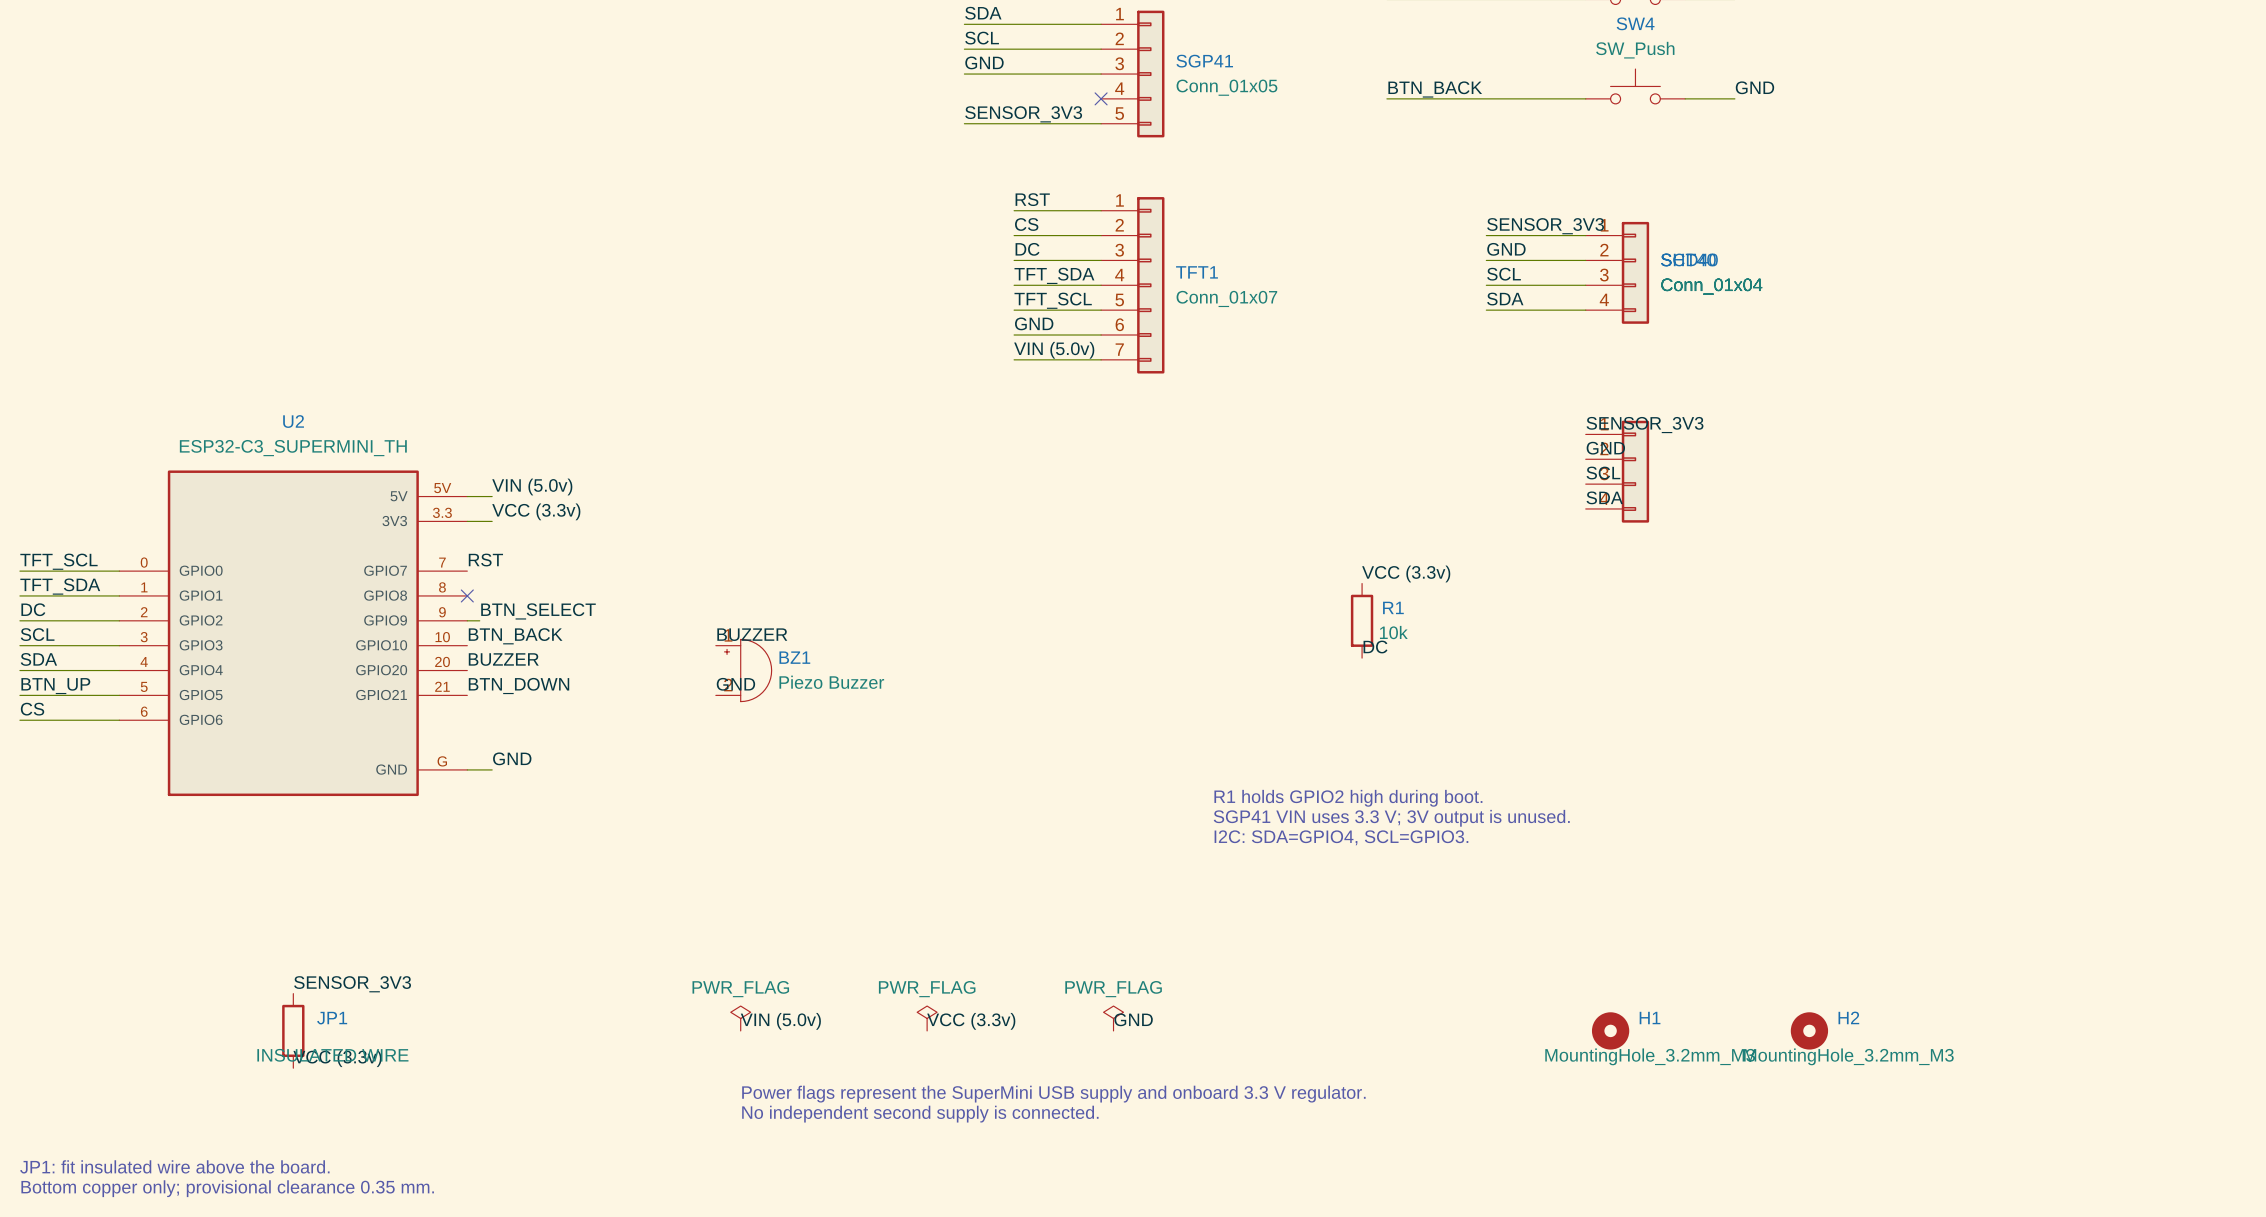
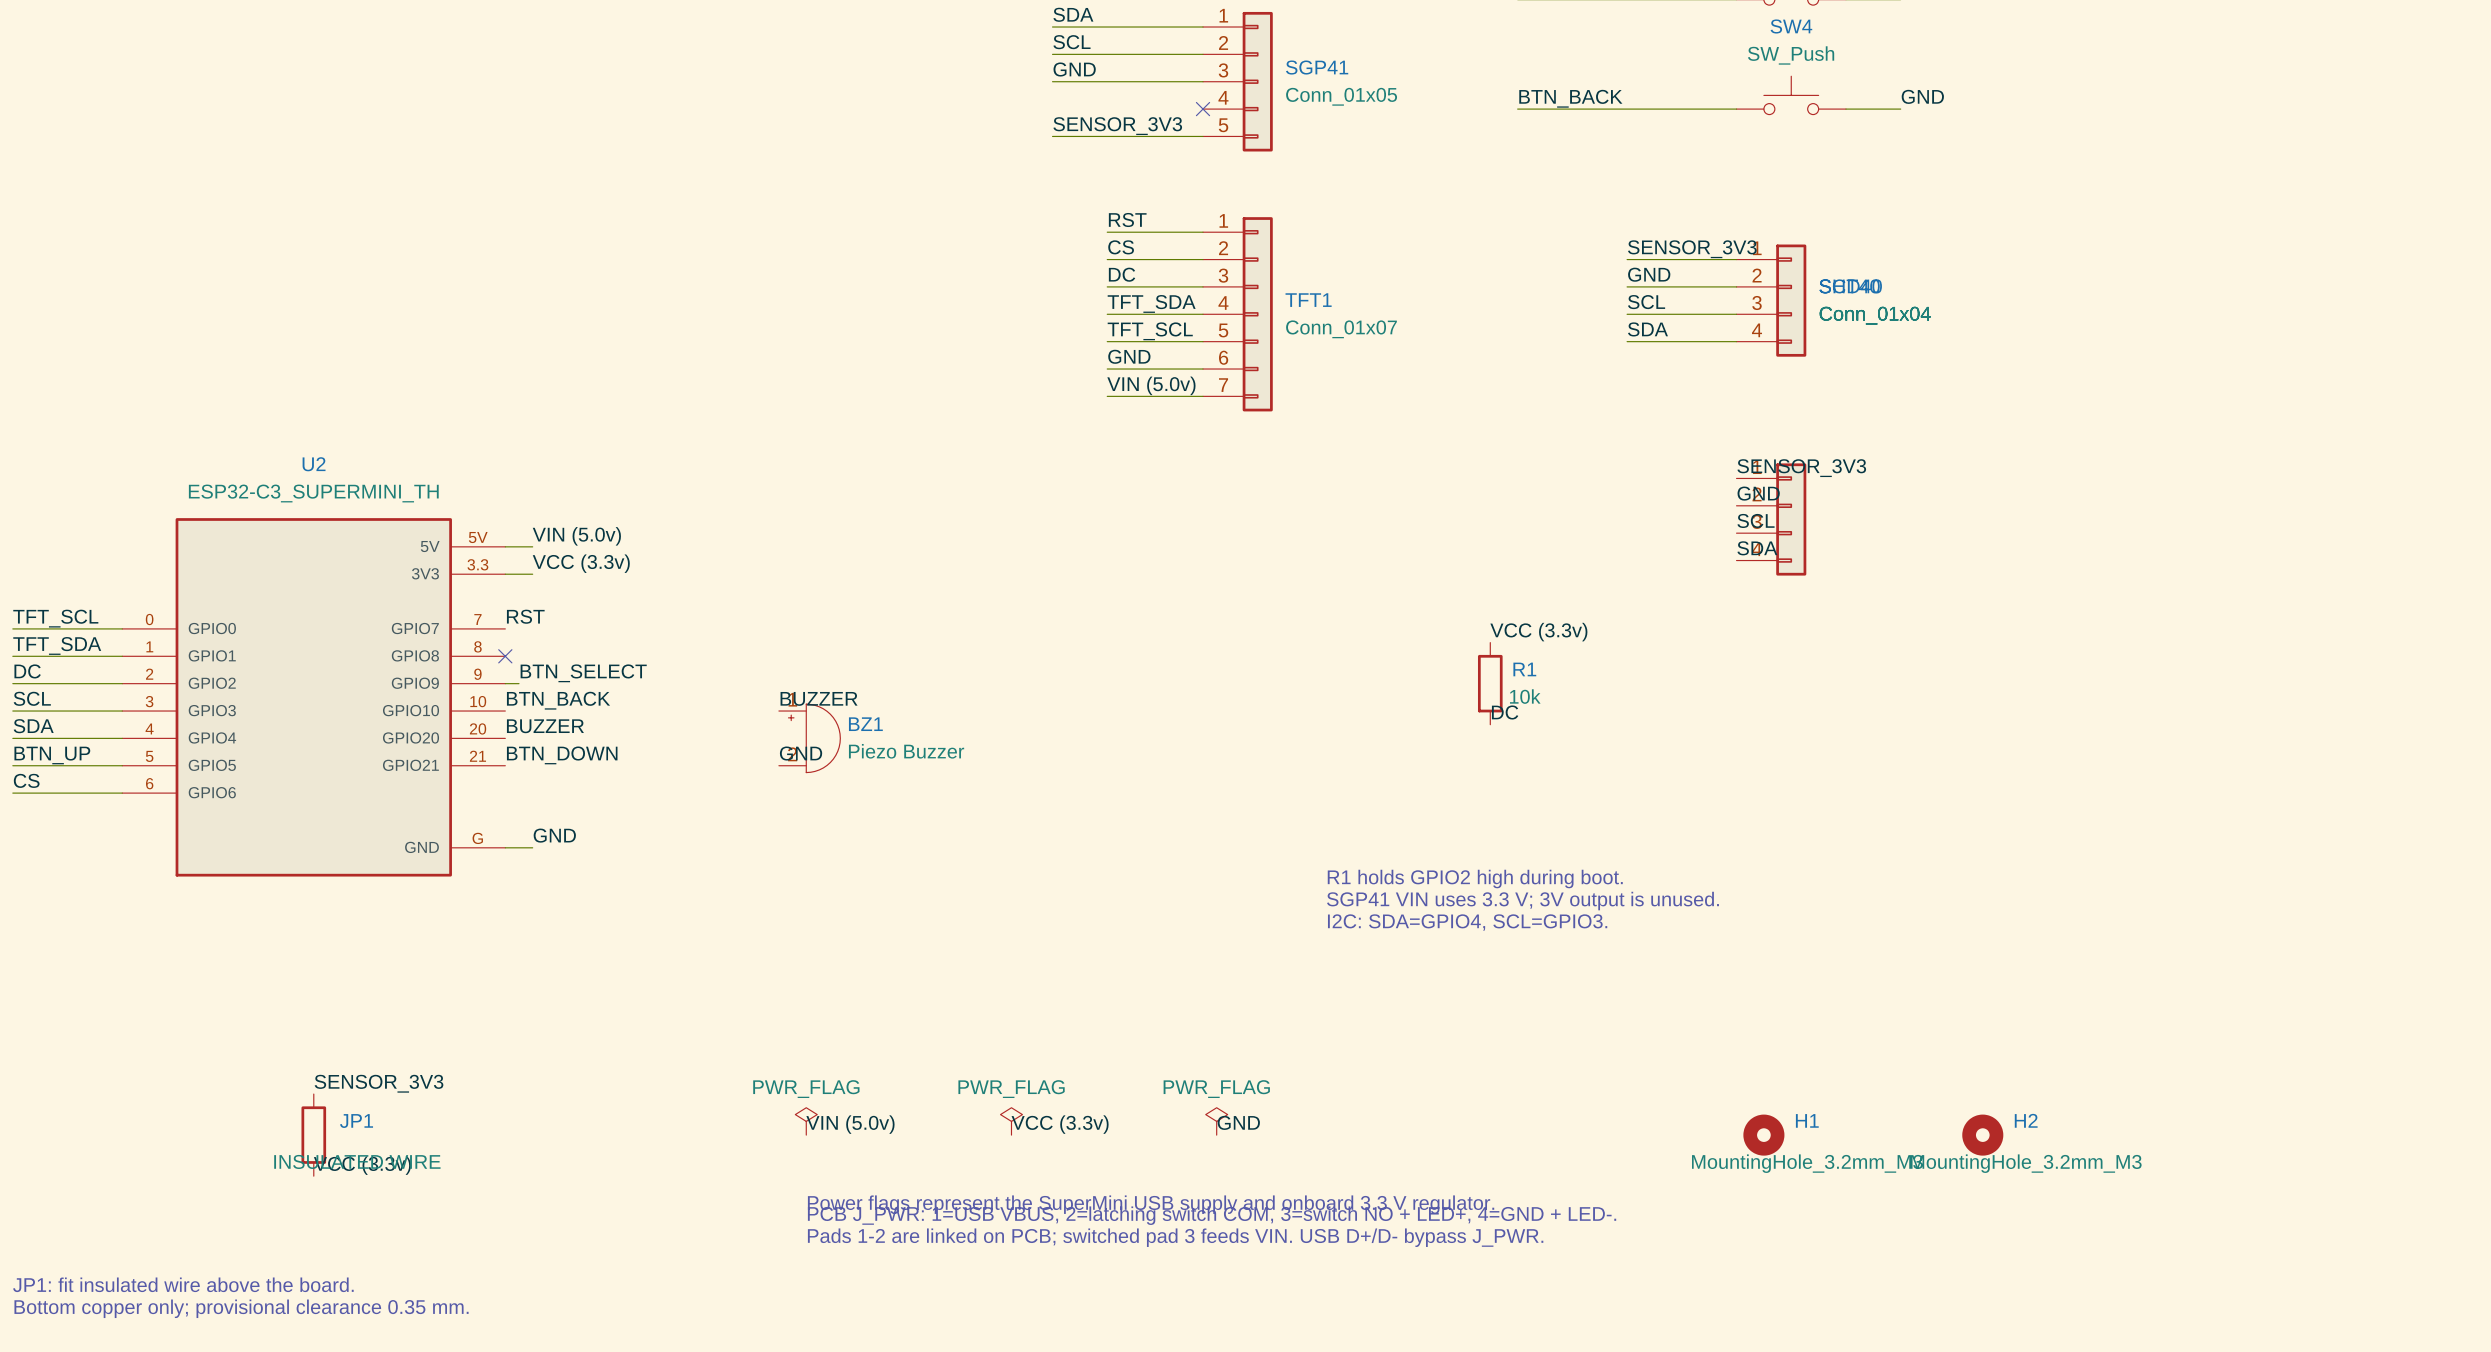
text: none -> PCB J_PWR: 1=USB VBUS, 2=latching switch COM, 3=switch NO + LED+, 4=GND + LED-. (1212, 1215)
text: No independent second supply is connected. (920, 1114) -> none
text: none -> Pads 1-2 are linked on PCB; switched pad 3 feeds VIN. USB D+/D- bypass J_PWR. (1175, 1237)

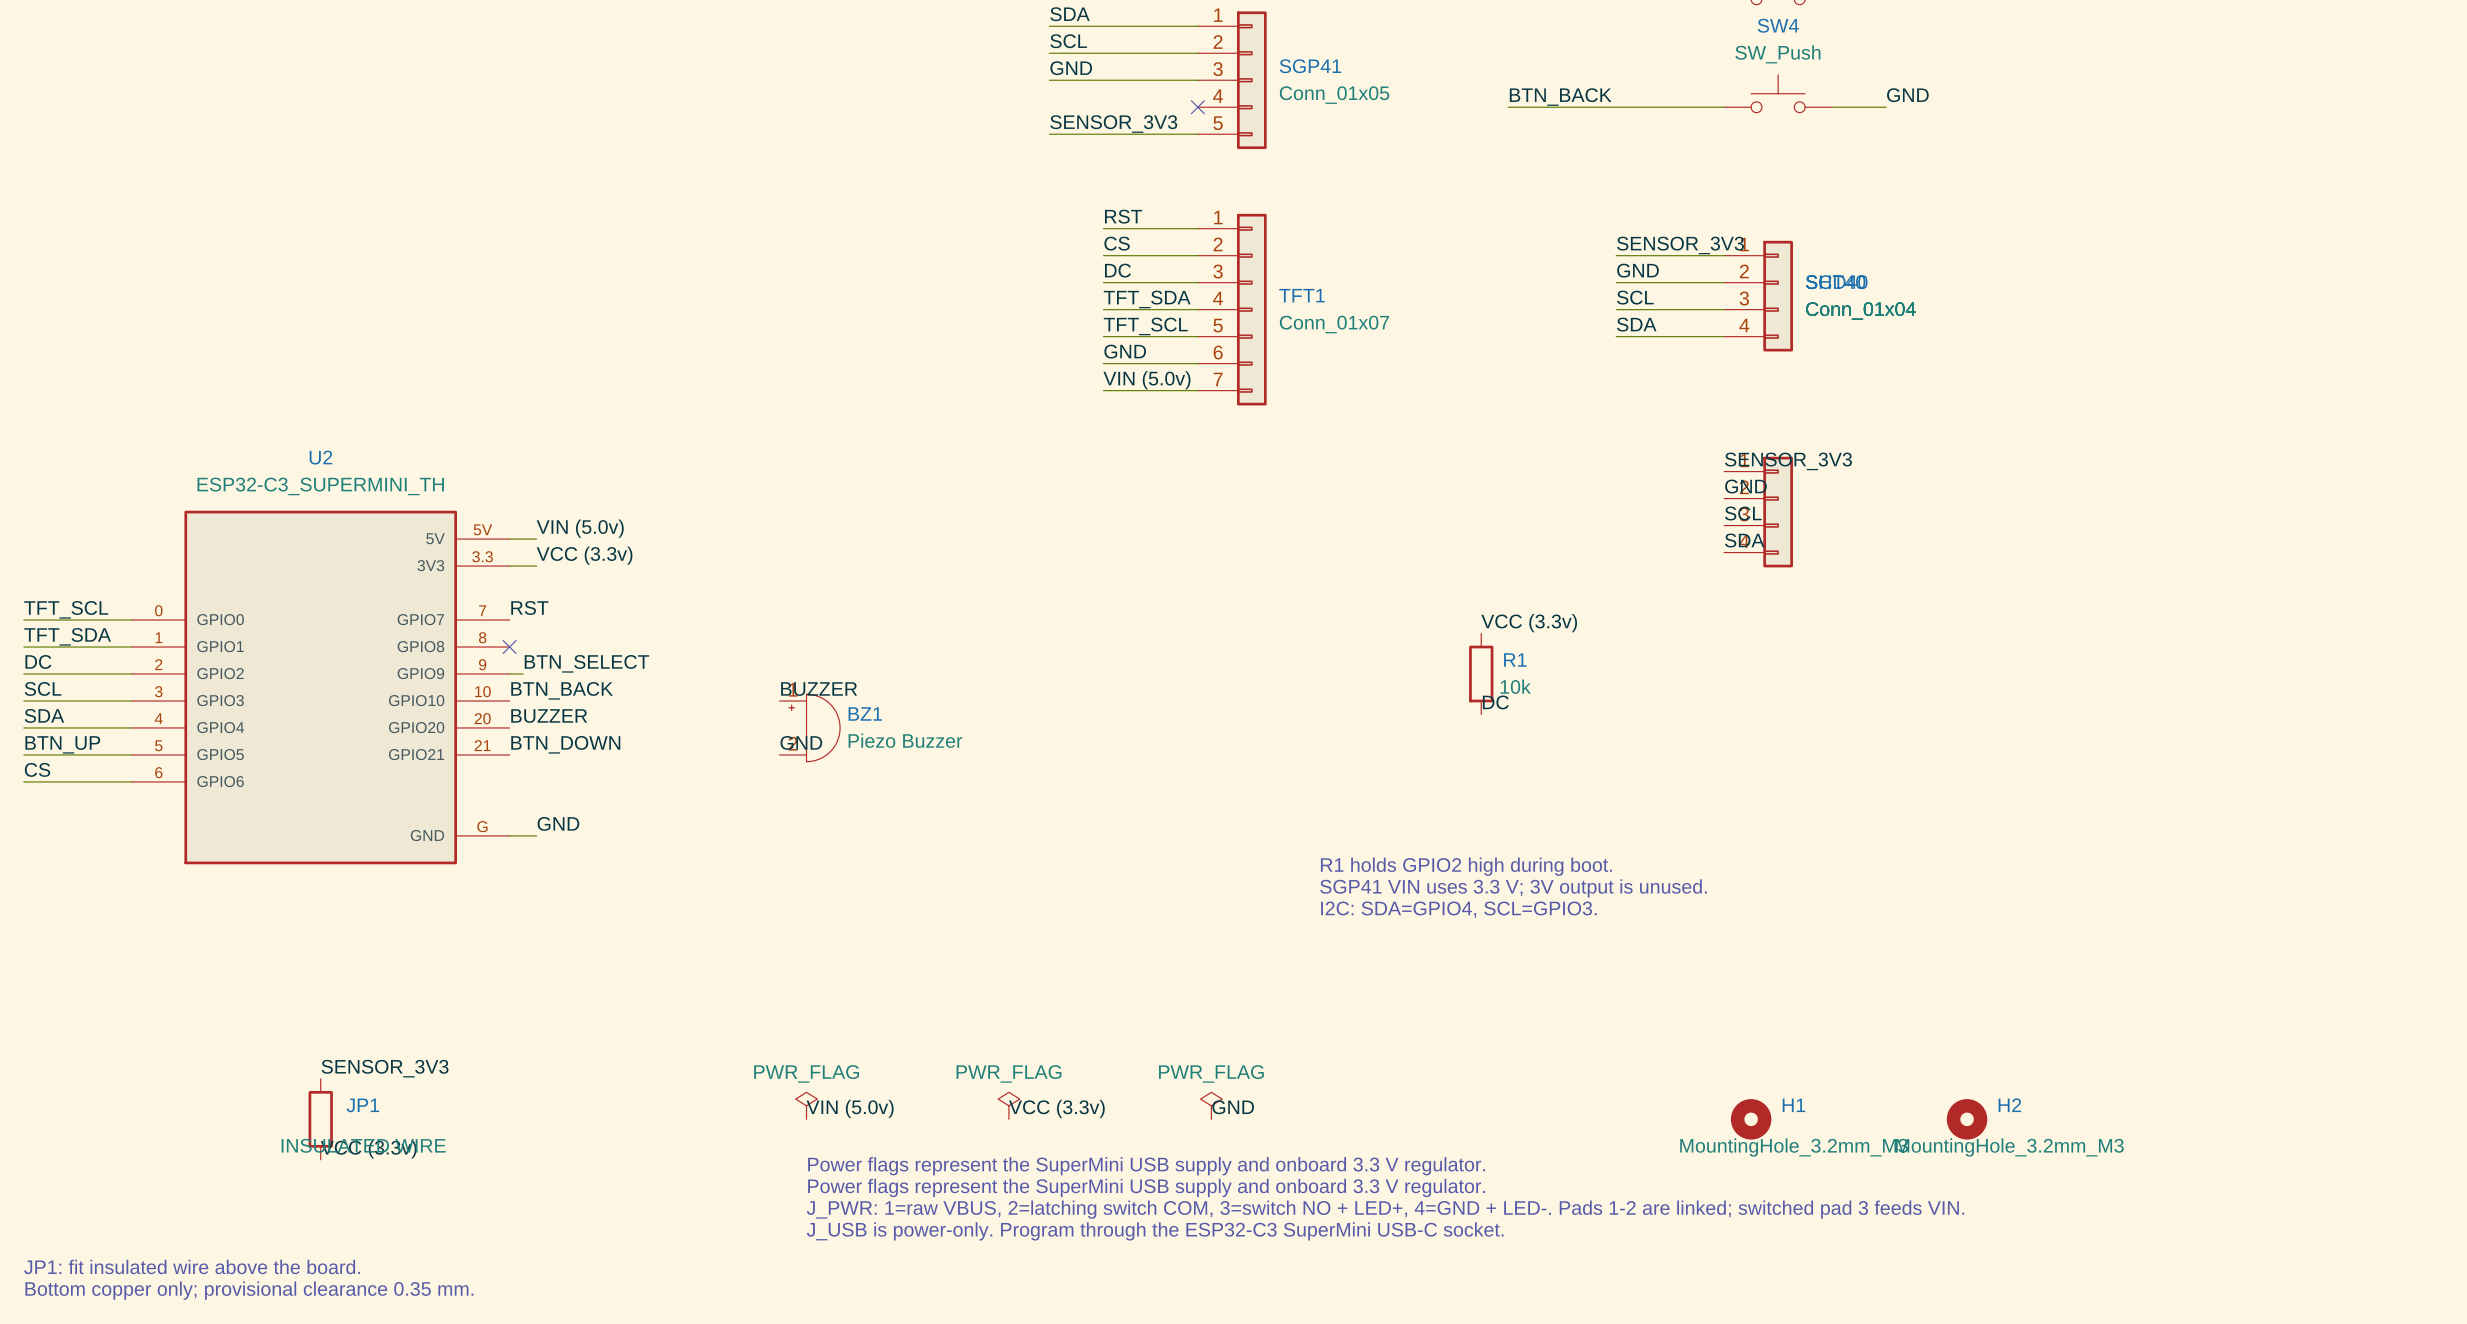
text: none -> Power flags represent the SuperMini USB supply and onboard 3.3 V regulator. (1146, 1166)
text: PCB J_PWR: 1=USB VBUS, 2=latching switch COM, 3=switch NO + LED+, 4=GND + LED-. (1212, 1215) -> J_PWR: 1=raw VBUS, 2=latching switch COM, 3=switch NO + LED+, 4=GND + LED-. Pads 1-2 are linked; switched pad 3 feeds VIN. (1385, 1209)
text: Pads 1-2 are linked on PCB; switched pad 3 feeds VIN. USB D+/D- bypass J_PWR. (1175, 1237) -> none
text: none -> J_USB is power-only. Program through the ESP32-C3 SuperMini USB-C socket. (1155, 1231)

